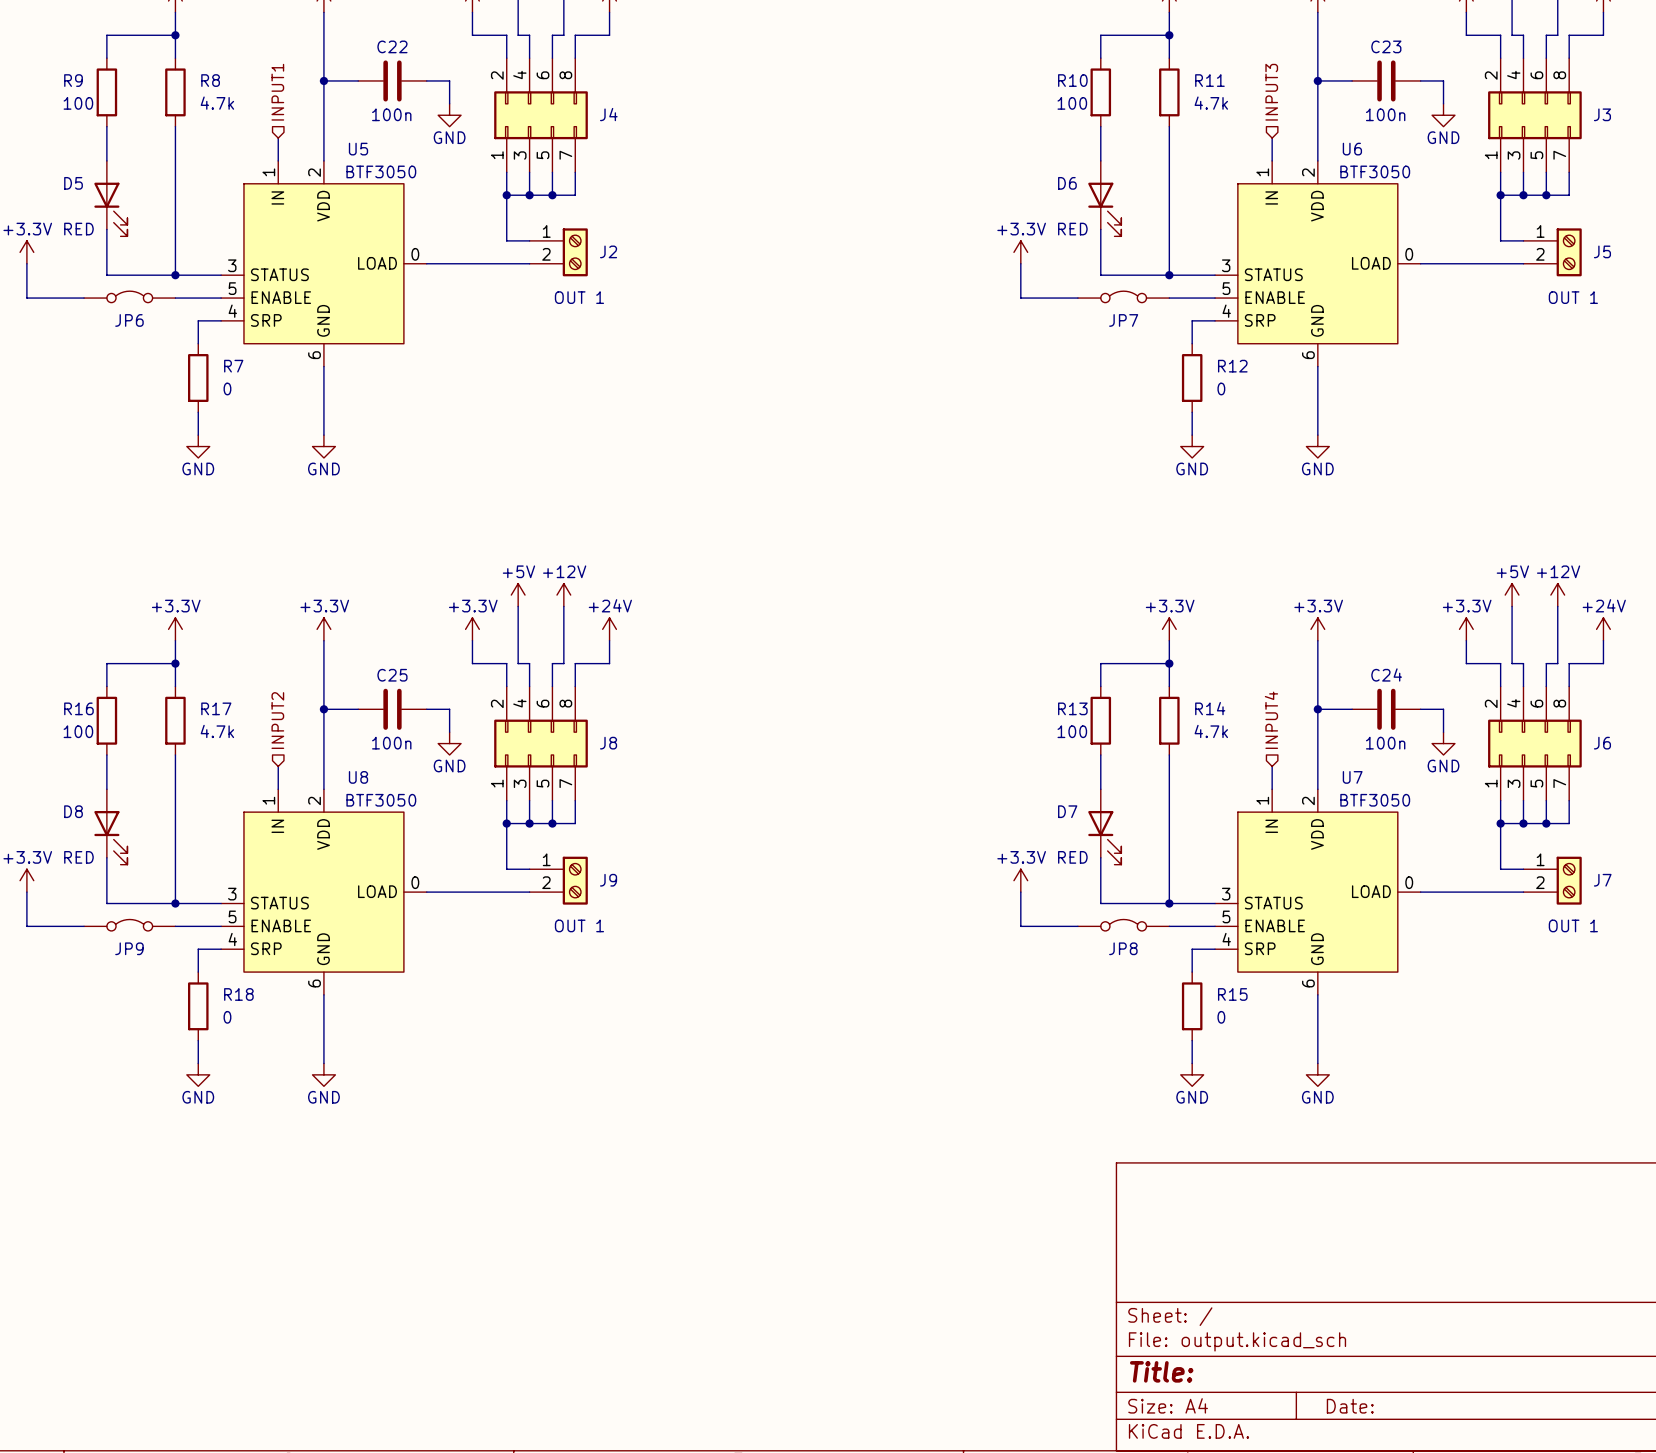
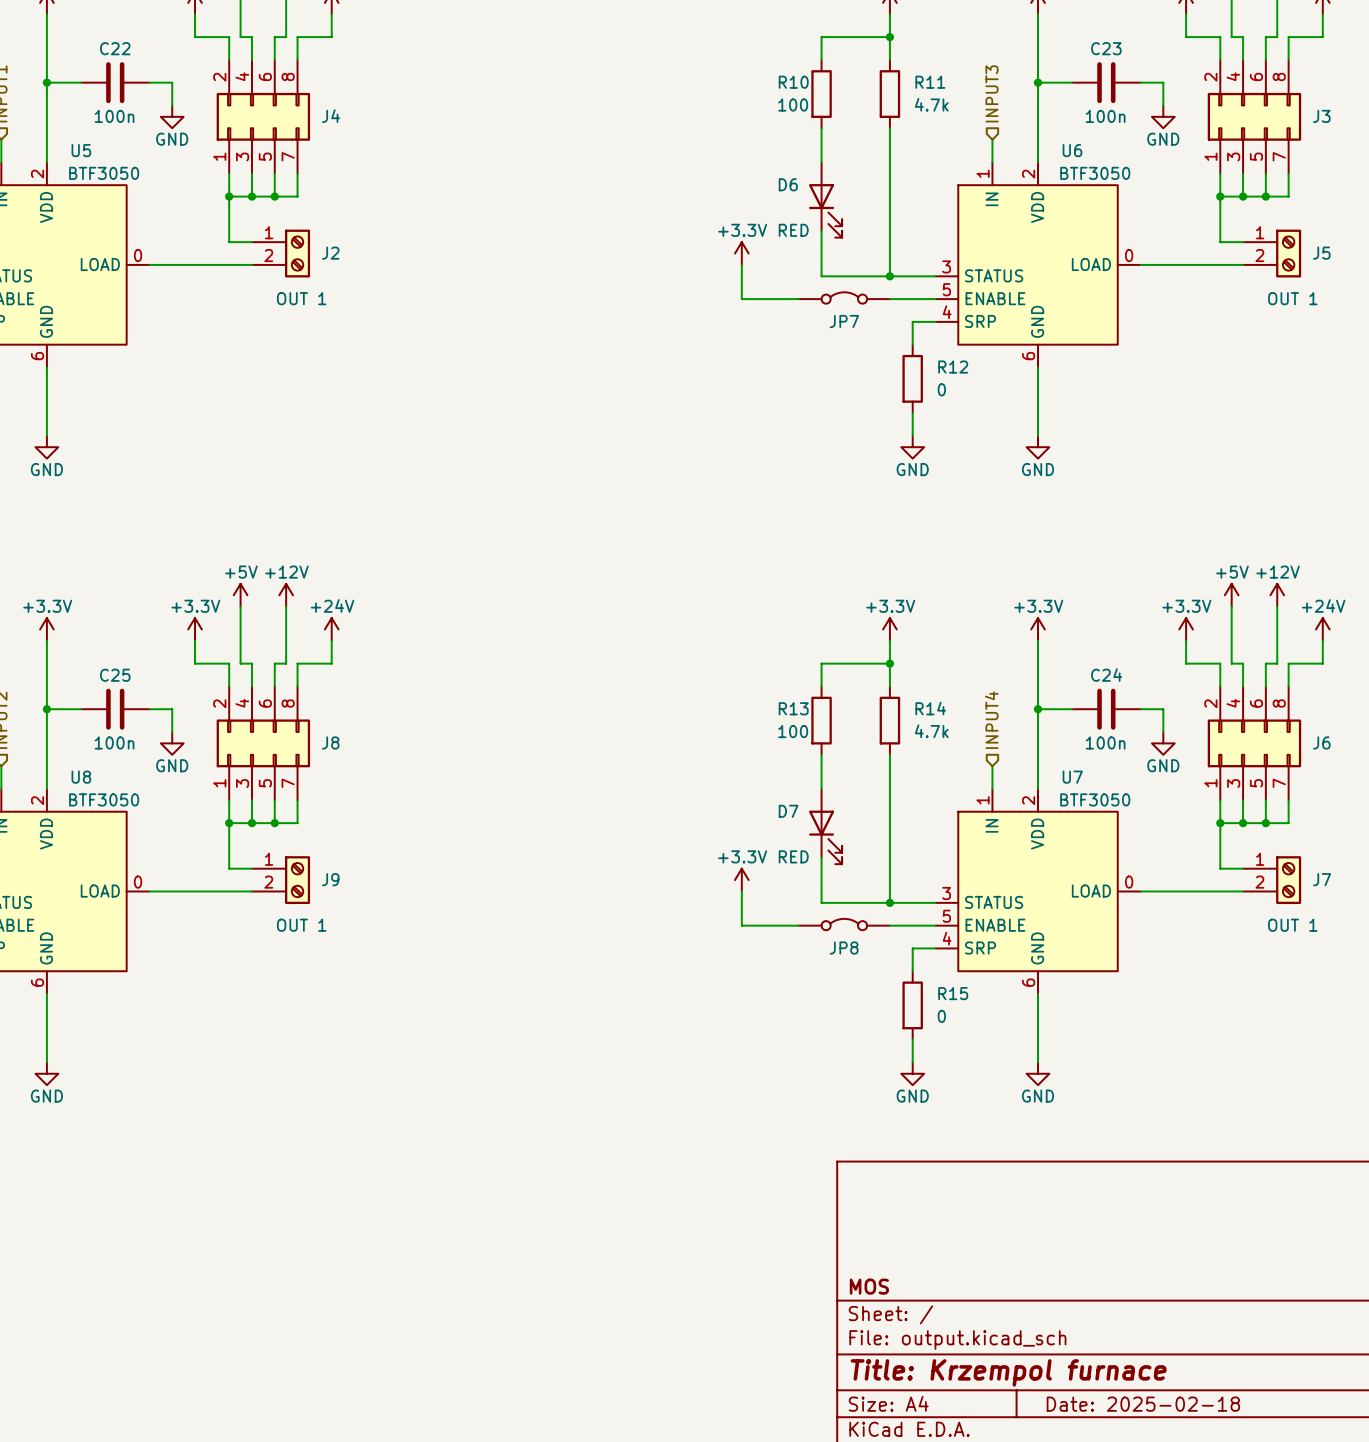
title block: none -> MOS (869, 1286)
title block: Title: (1161, 1371) -> Title: Krzempol furnace (1008, 1372)
title block: Date: (1350, 1406) -> Date: 2025-02-18 (1143, 1404)

